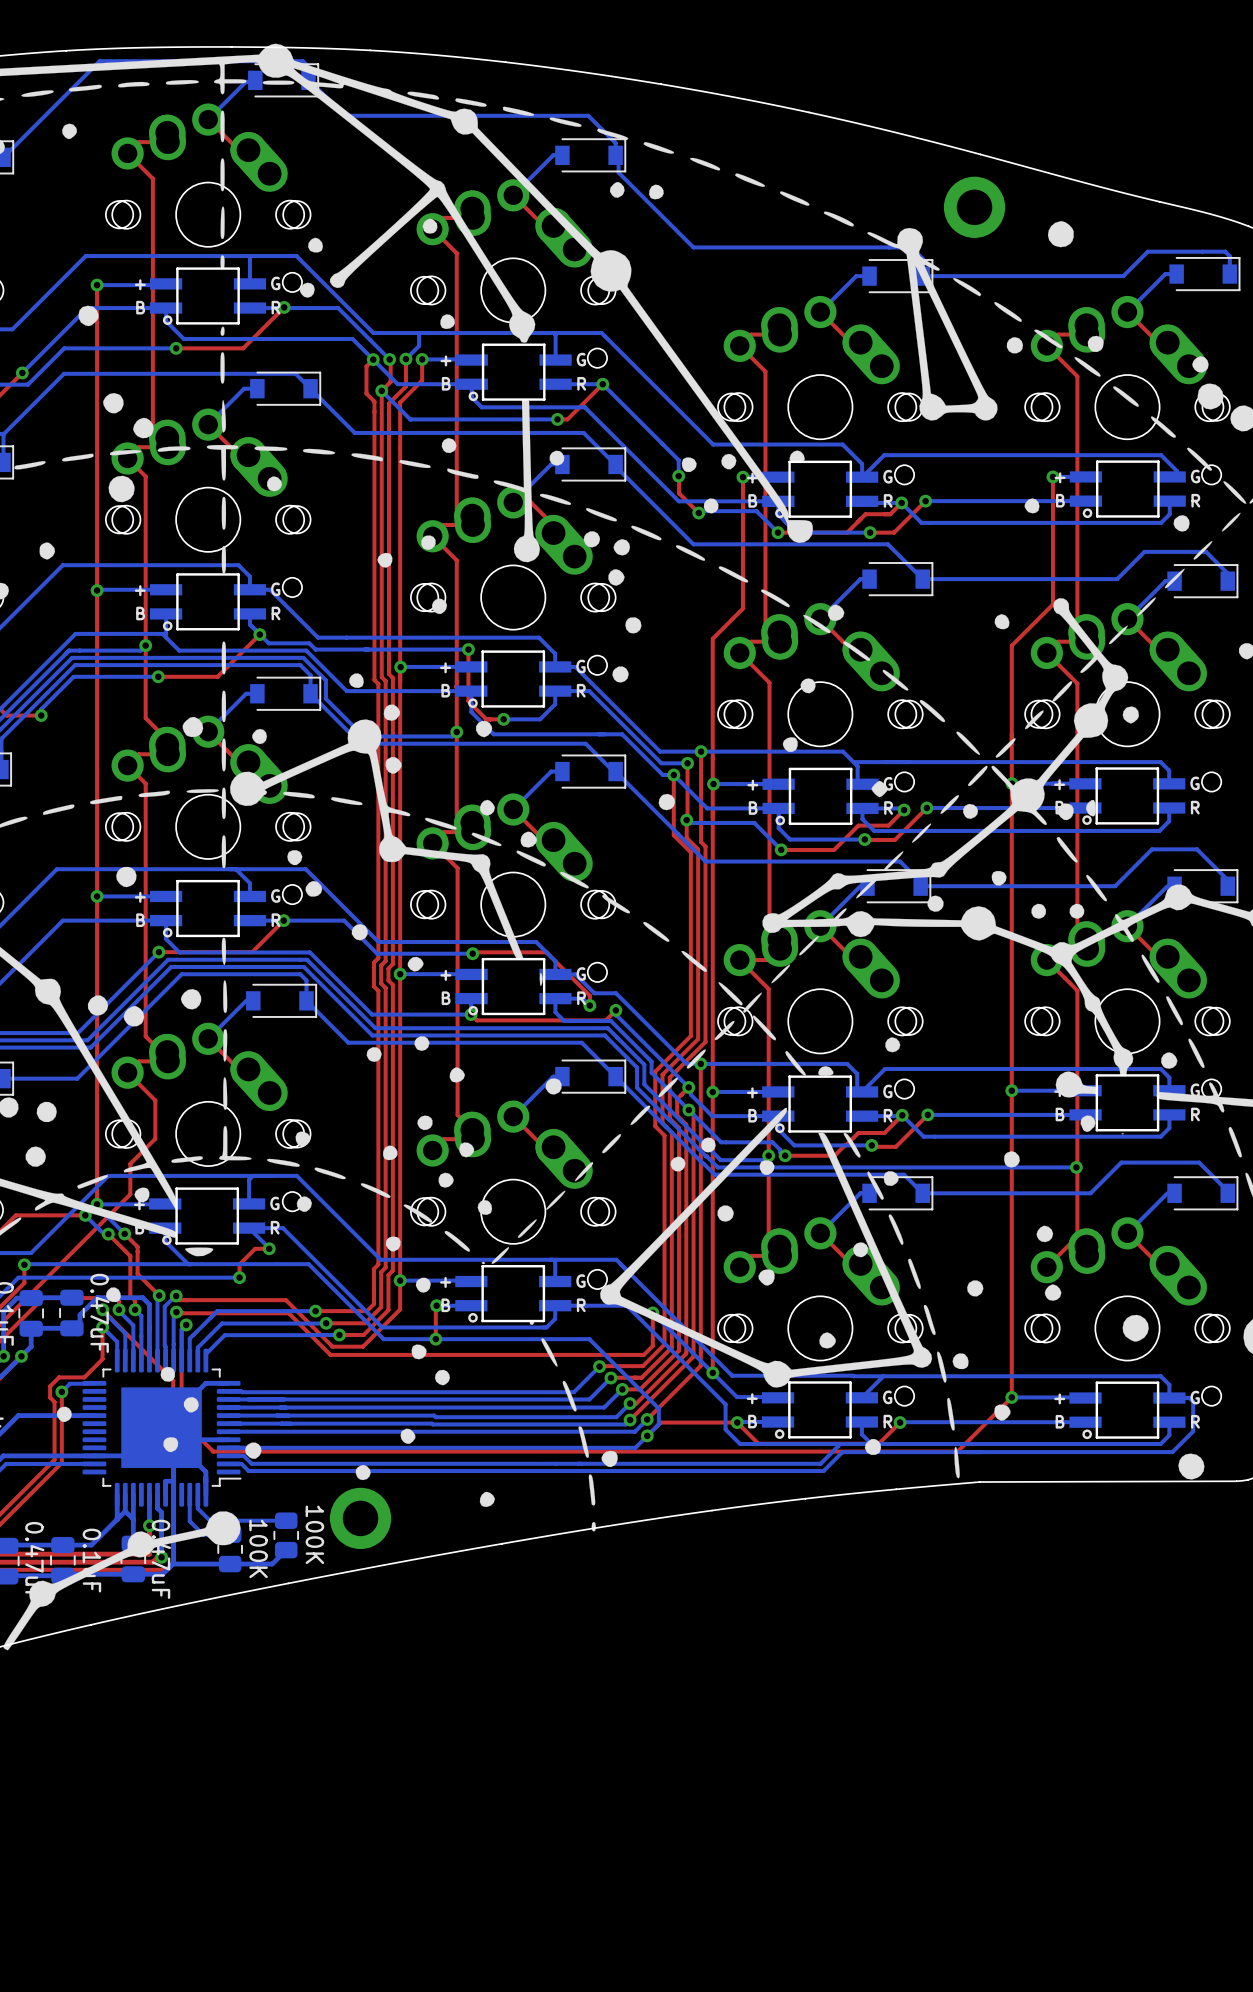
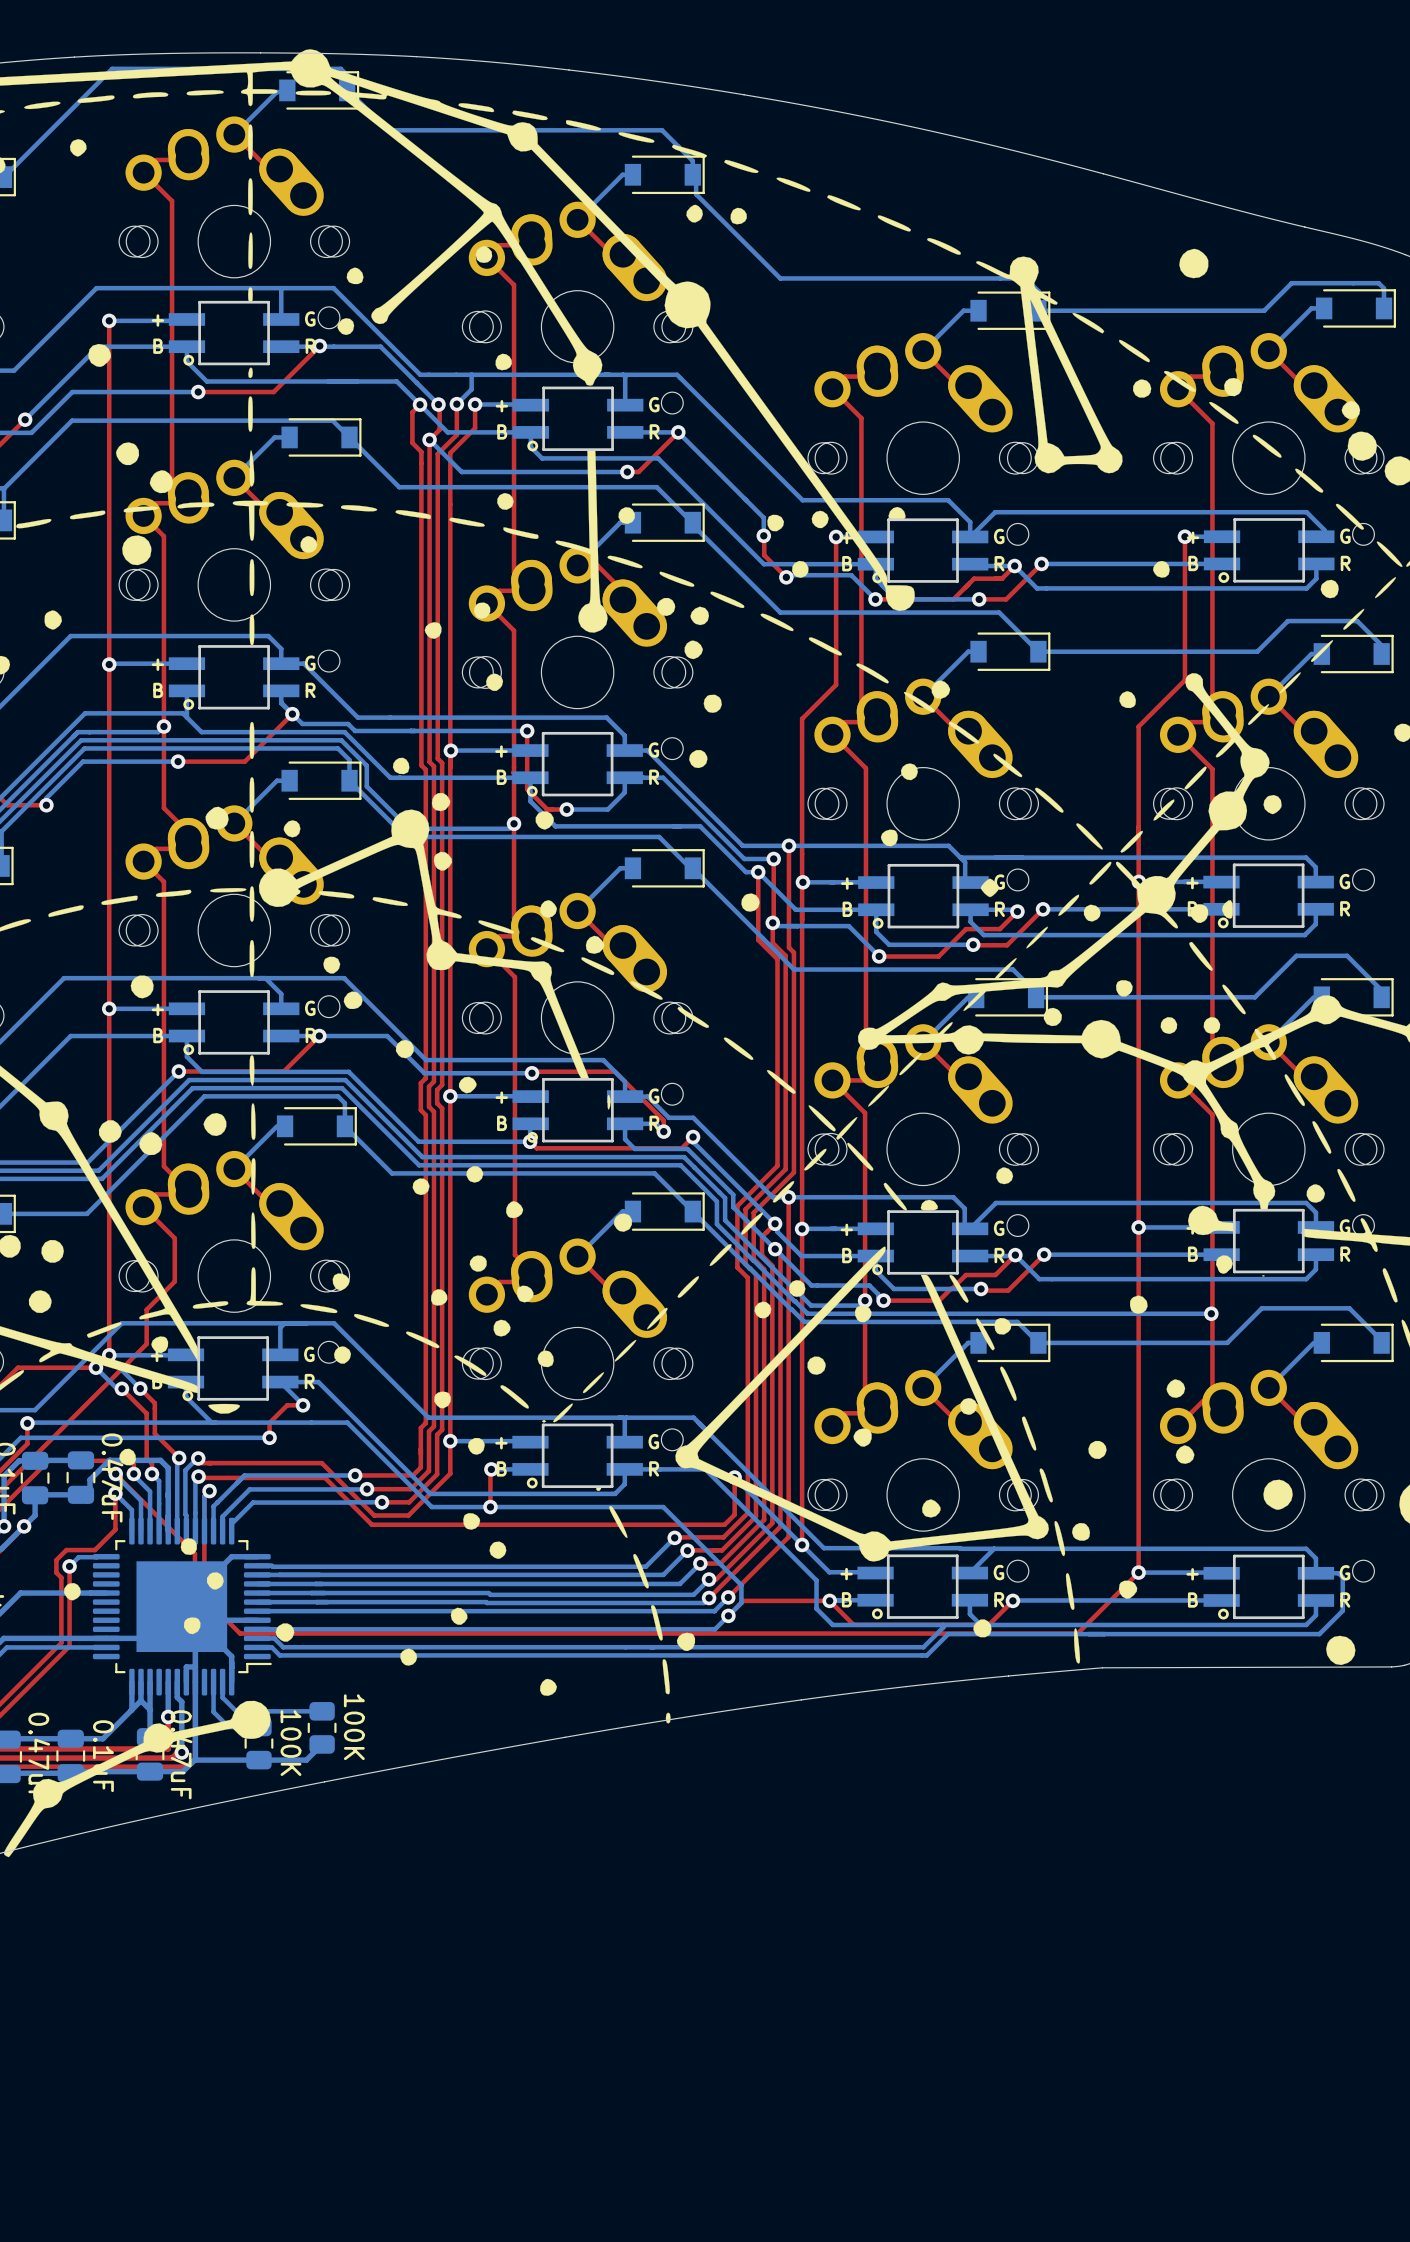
part: (974, 207) -> none
part: (360, 1518) -> none

